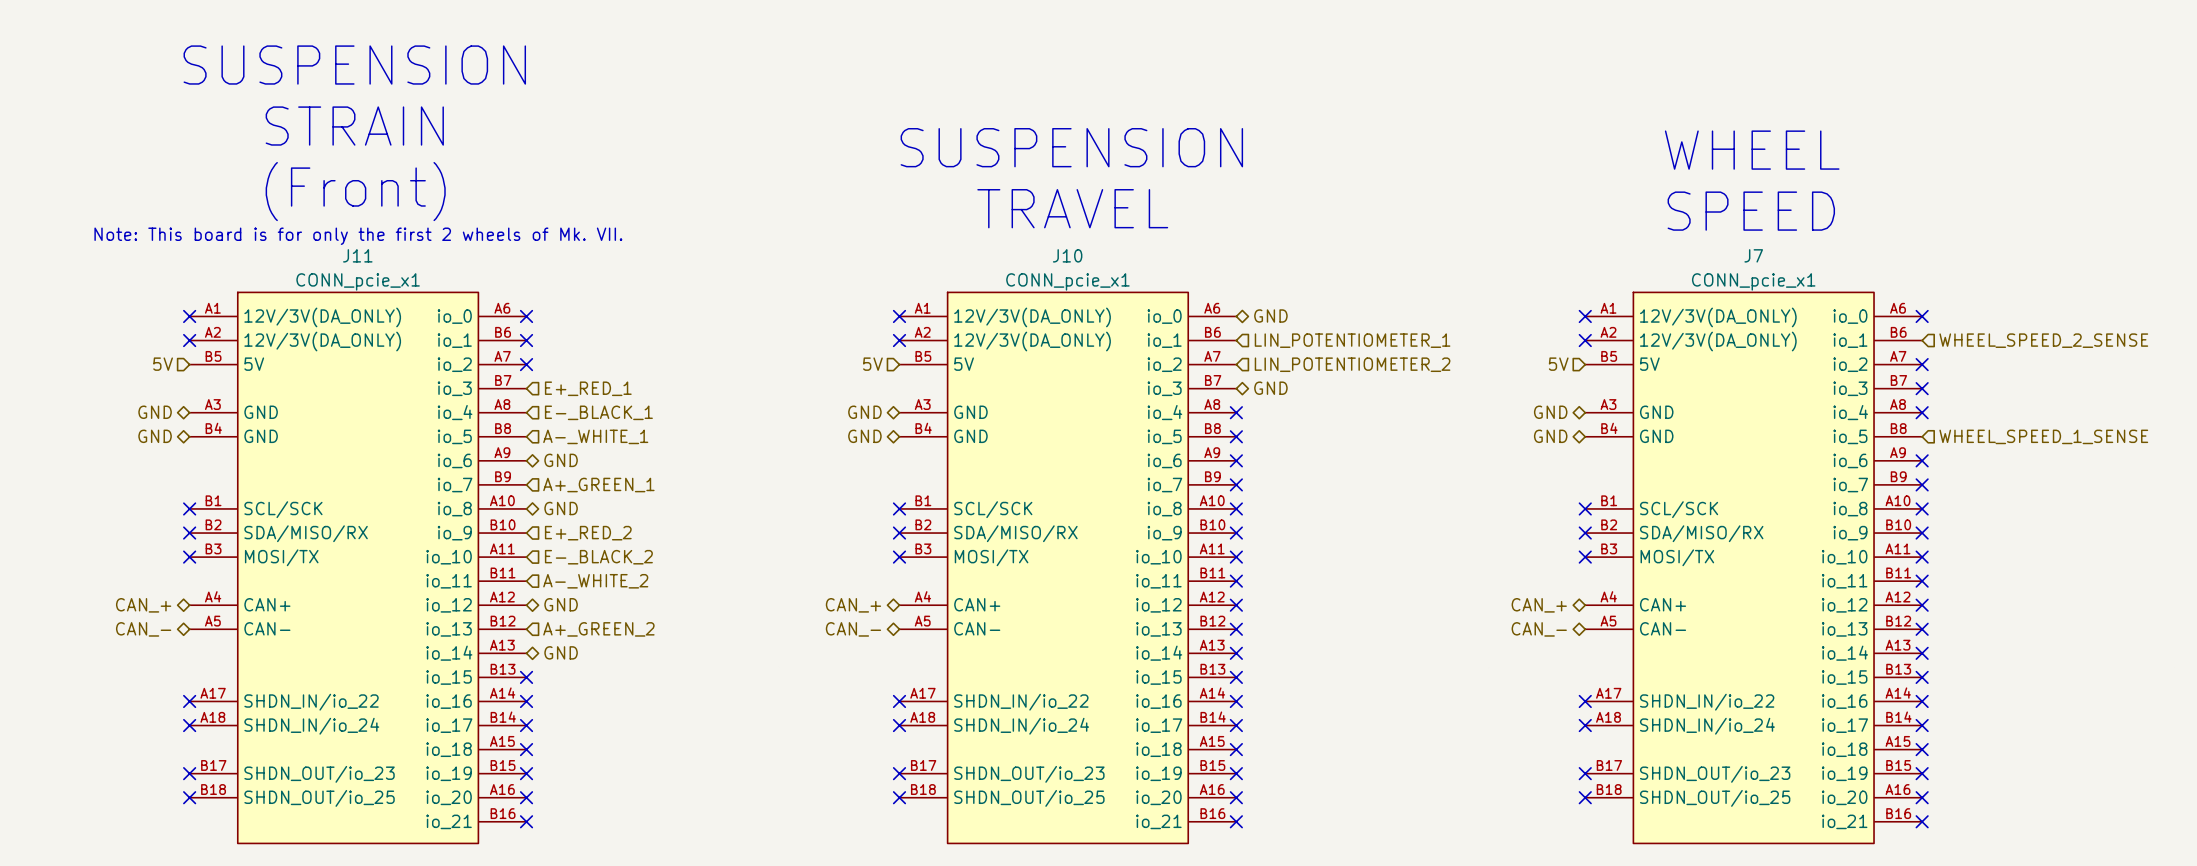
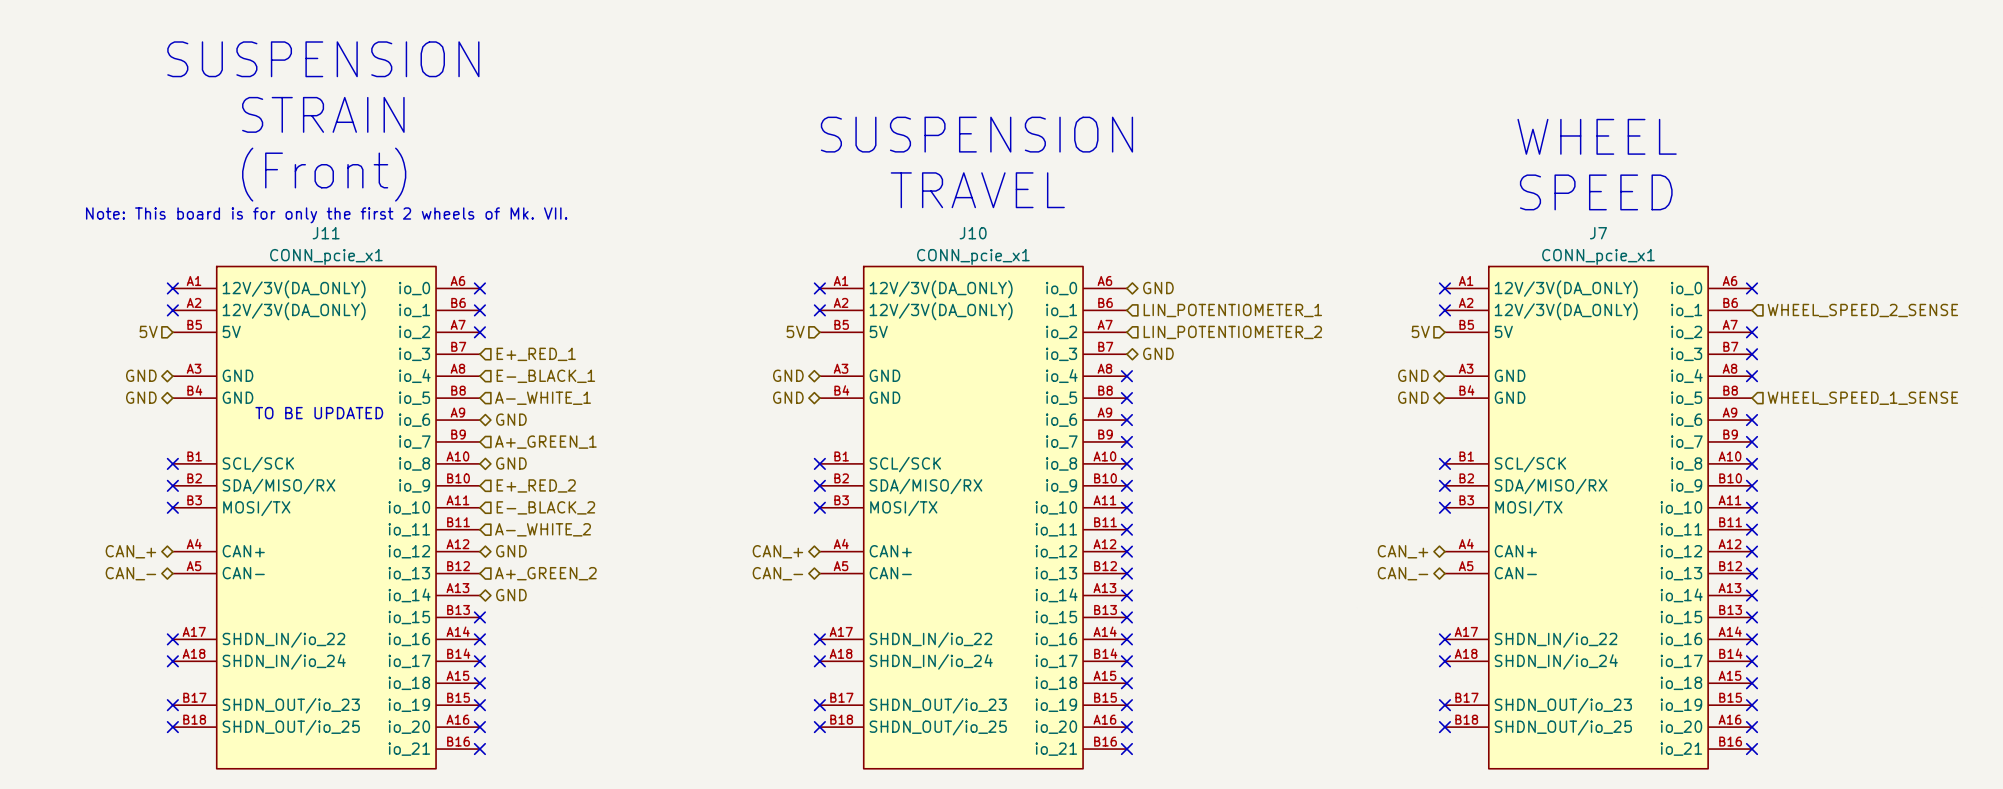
text: none -> TO BE UPDATED (319, 413)

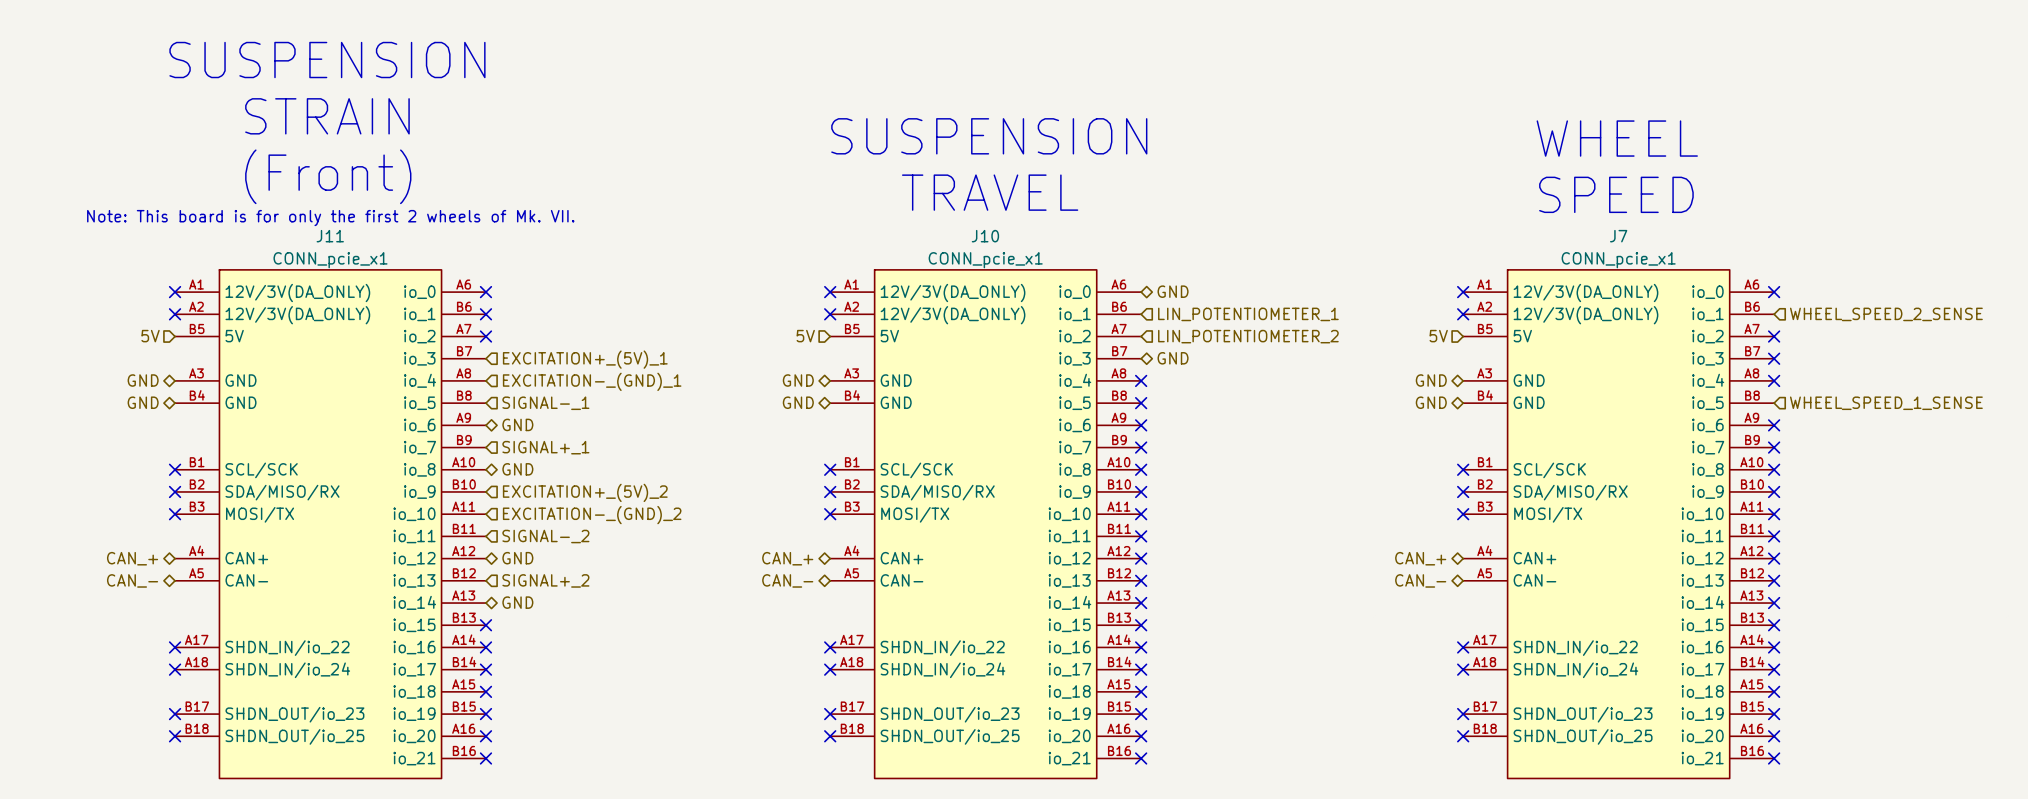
hierarchical label: E+_RED_1 (536, 354) -> EXCITATION+_(5V)_1 (585, 359)
hierarchical label: E-_BLACK_1 (545, 376) -> EXCITATION-_(GND)_1 (592, 381)
hierarchical label: A-_WHITE_1 (543, 398) -> SIGNAL-_1 (545, 403)
text: TO BE UPDATED (319, 413) -> none
hierarchical label: A+_GREEN_1 (545, 442) -> SIGNAL+_1 (545, 447)
hierarchical label: E+_RED_2 (536, 485) -> EXCITATION+_(5V)_2 (585, 492)
hierarchical label: E-_BLACK_2 (545, 507) -> EXCITATION-_(GND)_2 (592, 515)
hierarchical label: A-_WHITE_2 (543, 529) -> SIGNAL-_2 (545, 536)
hierarchical label: A+_GREEN_2 (545, 573) -> SIGNAL+_2 (545, 580)

